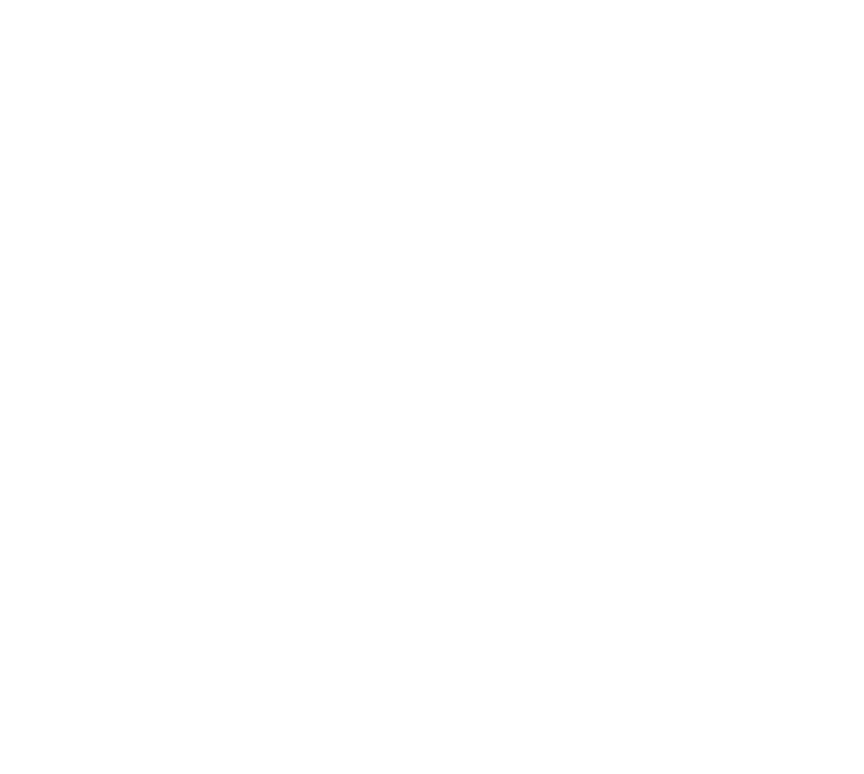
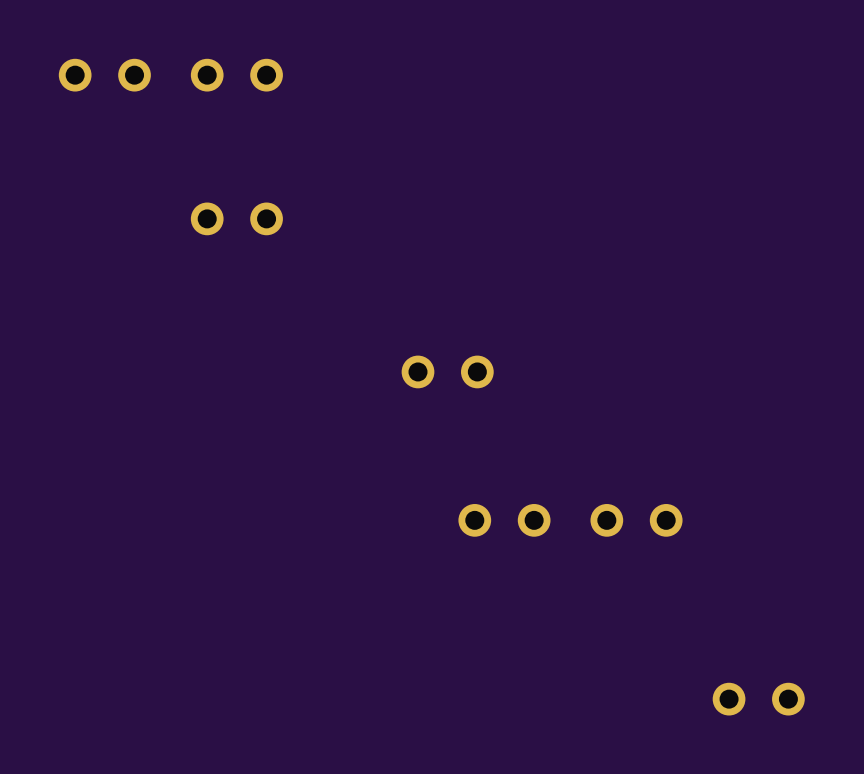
part: none -> (104, 75)
part: none -> (236, 75)
part: none -> (236, 218)
part: none -> (447, 371)
part: none -> (504, 520)
part: none -> (636, 520)
part: none -> (758, 699)

